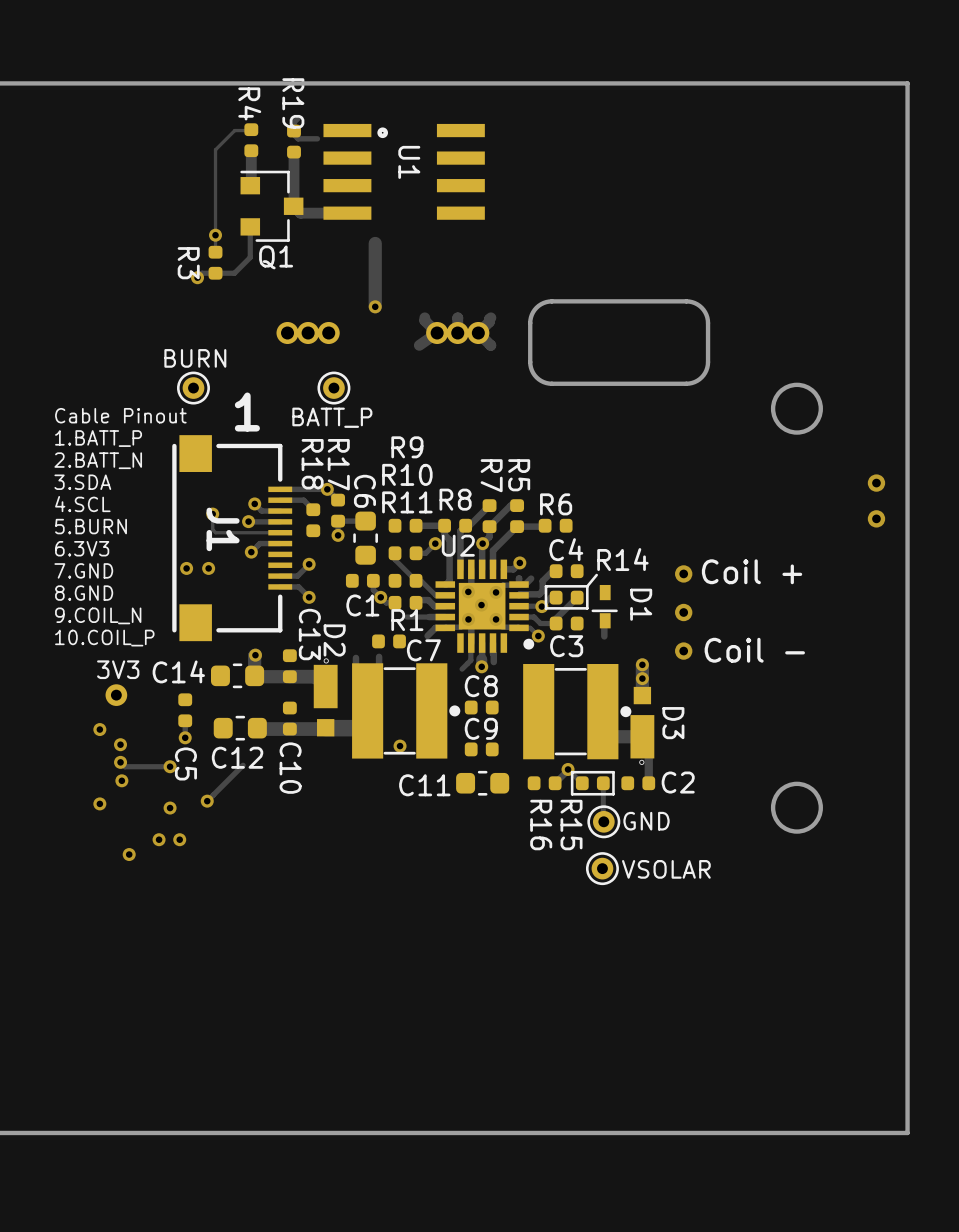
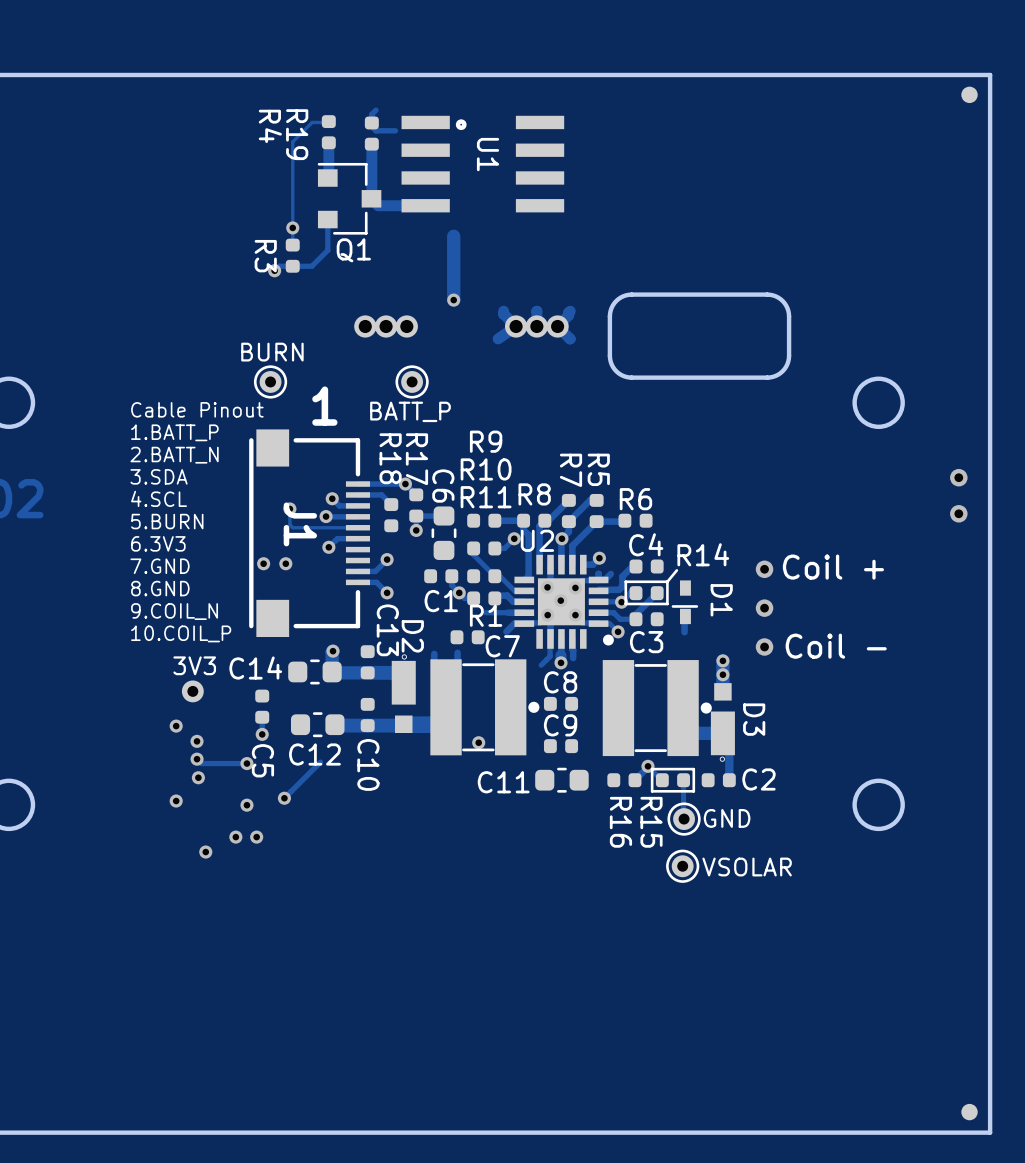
R4 name position: R4 (249, 103) -> R4 (270, 126)
R19 name position: R19 (293, 103) -> R19 (297, 134)
part: none -> (969, 94)
part: none -> (969, 1112)

